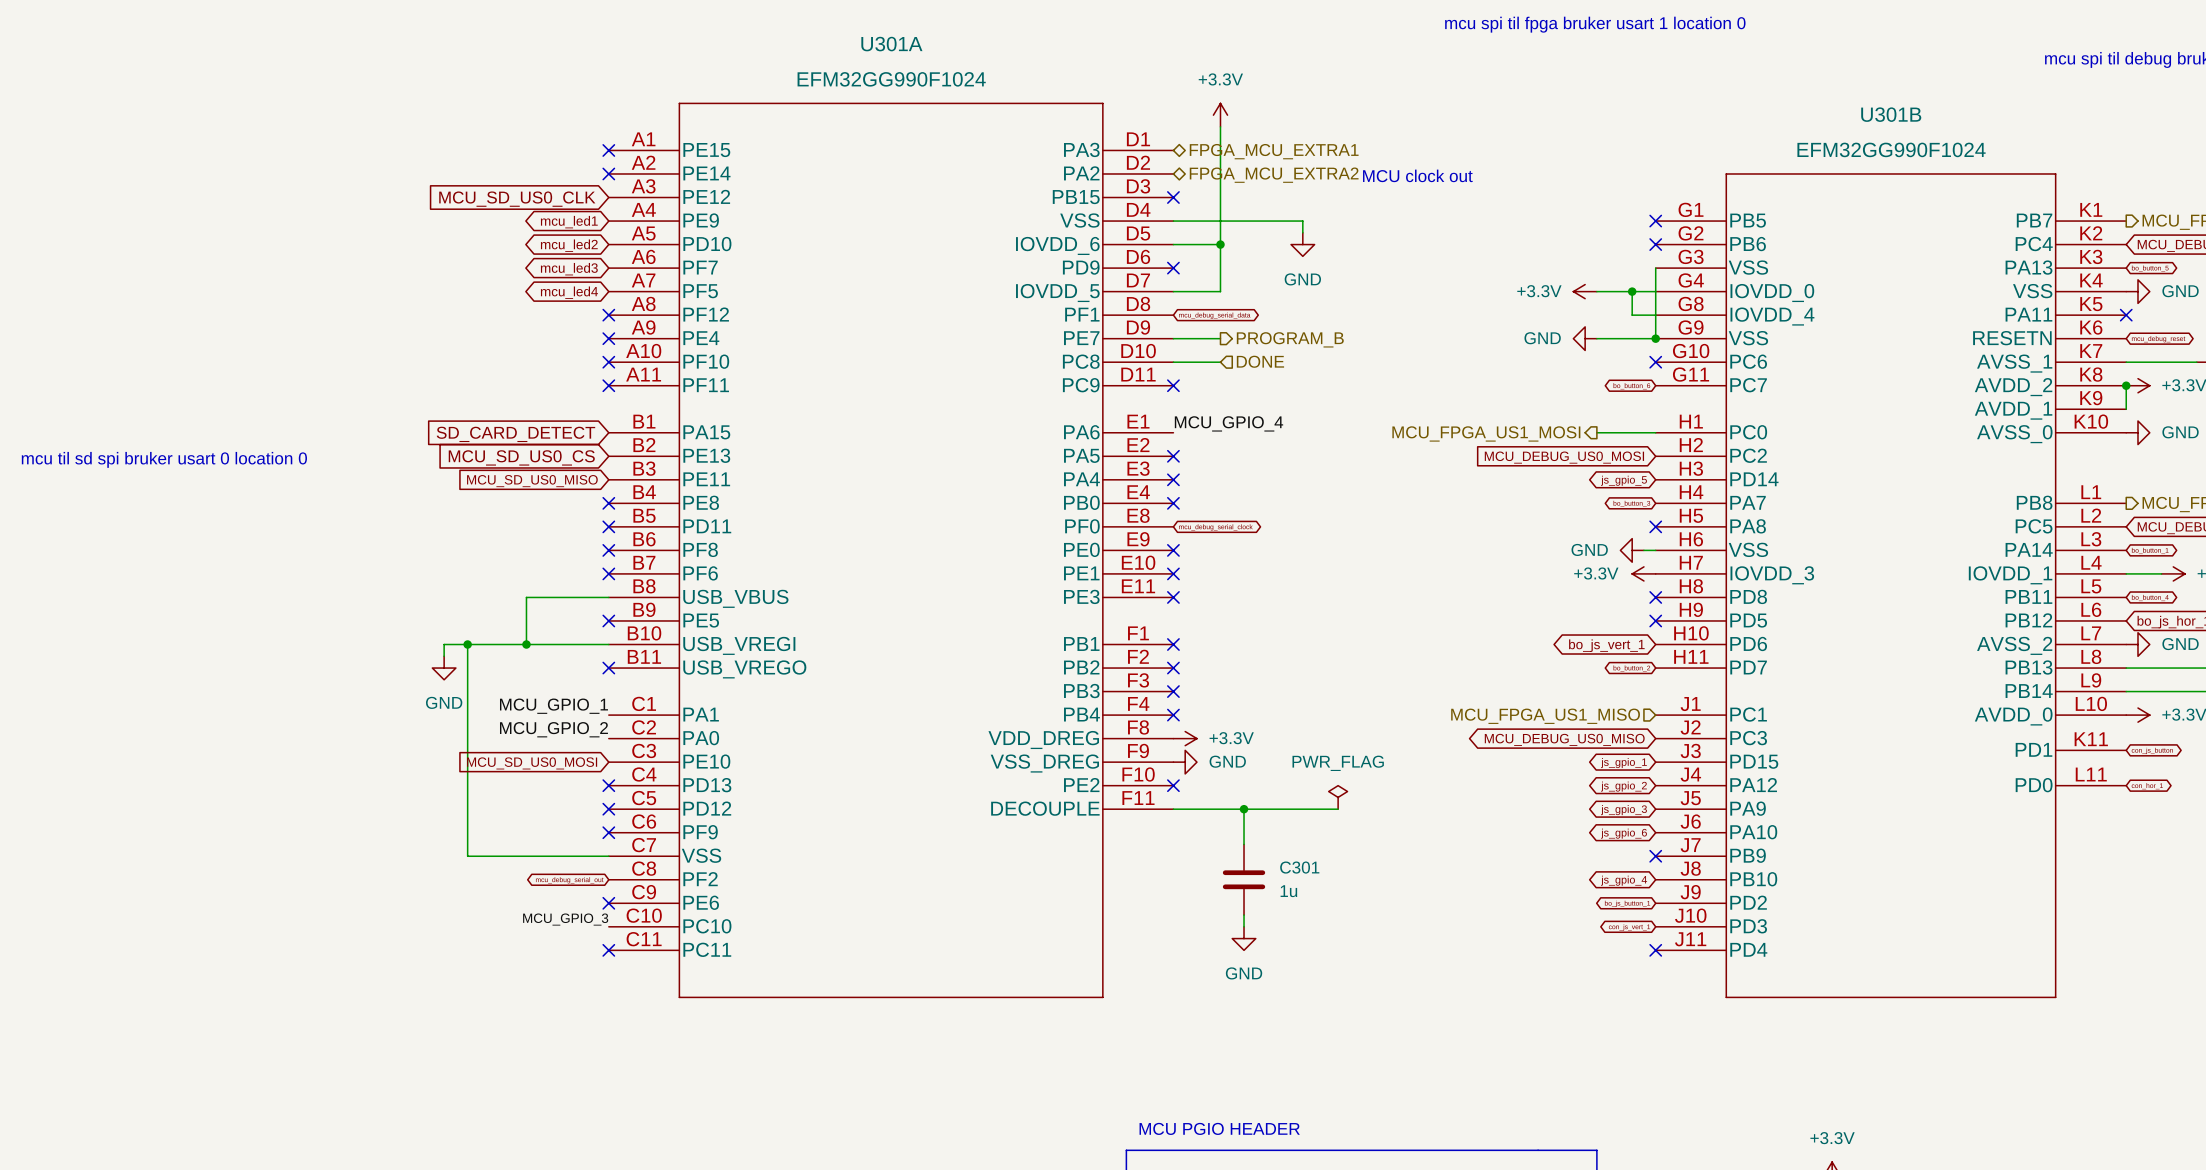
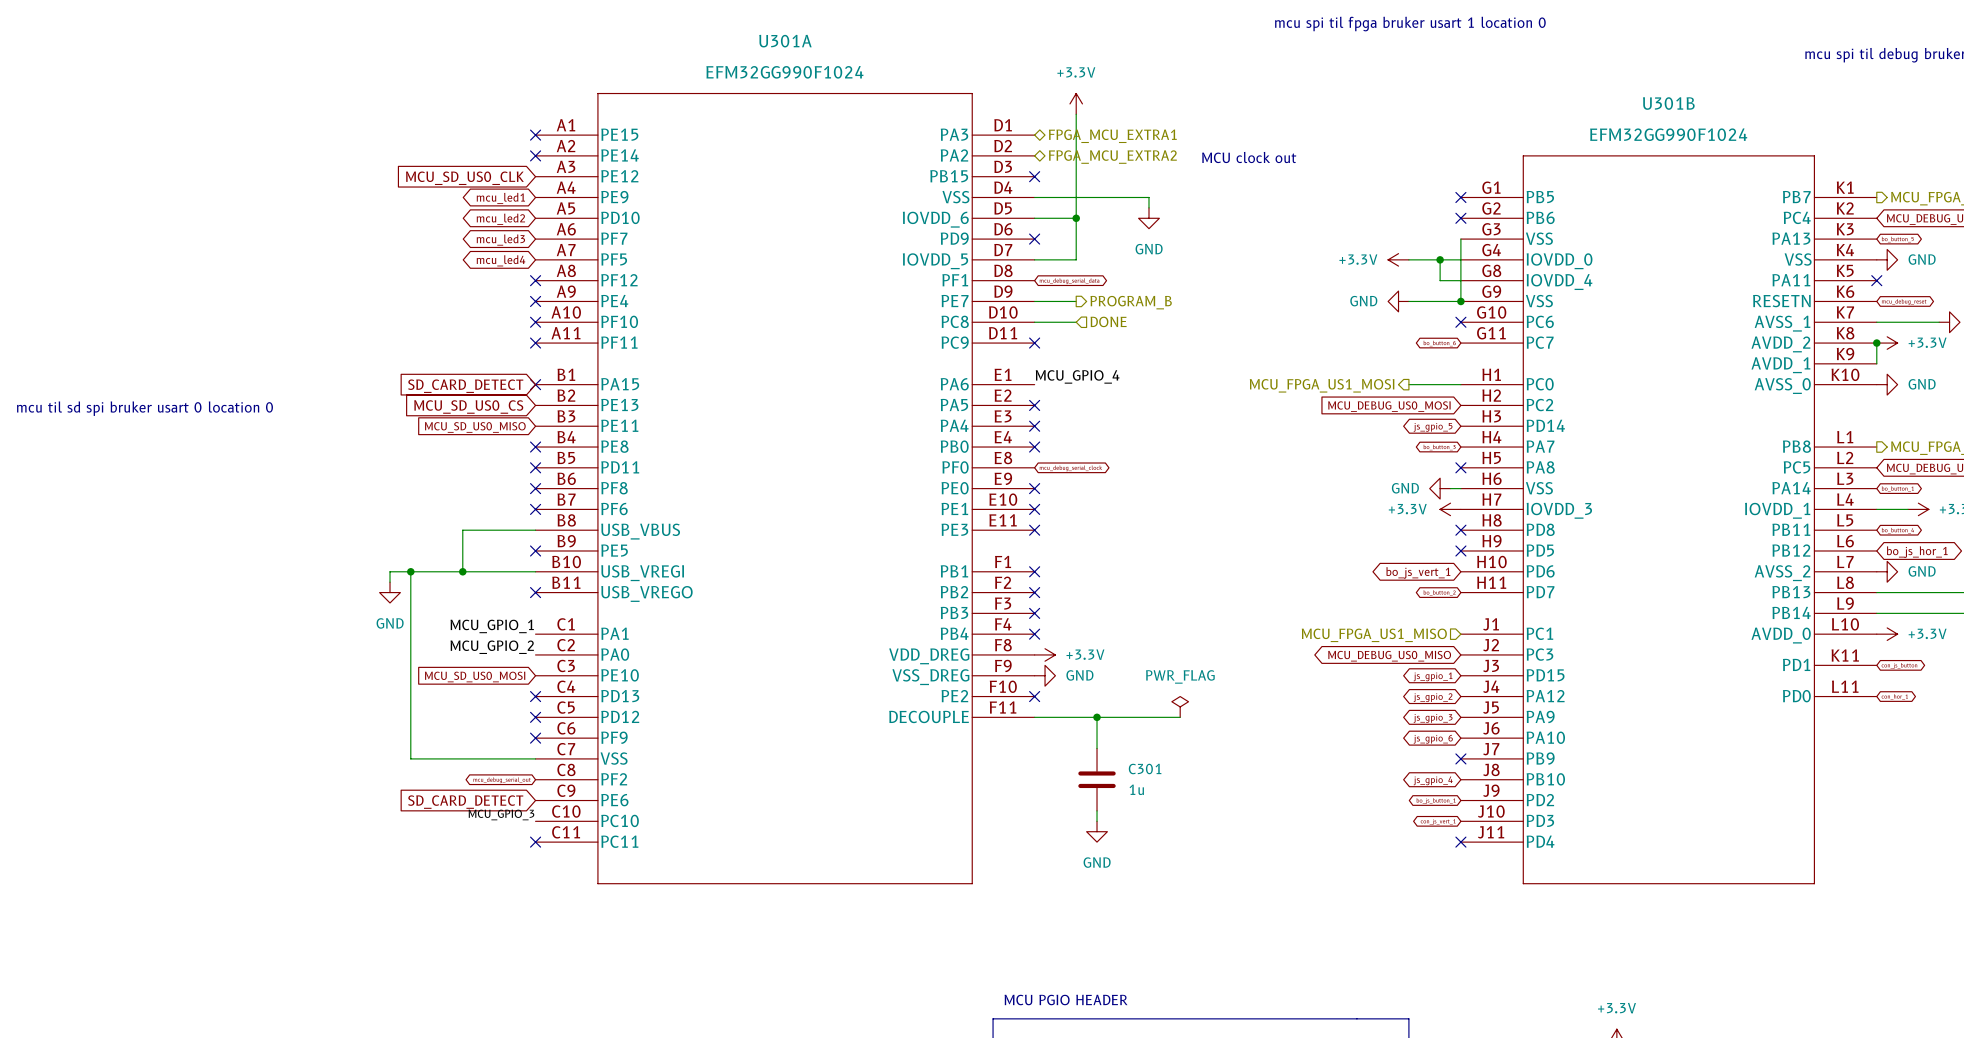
no-connect mark: none -> (535, 384)
no-connect mark: (608, 903) -> none
global label: none -> SD_CARD_DETECT (465, 802)

